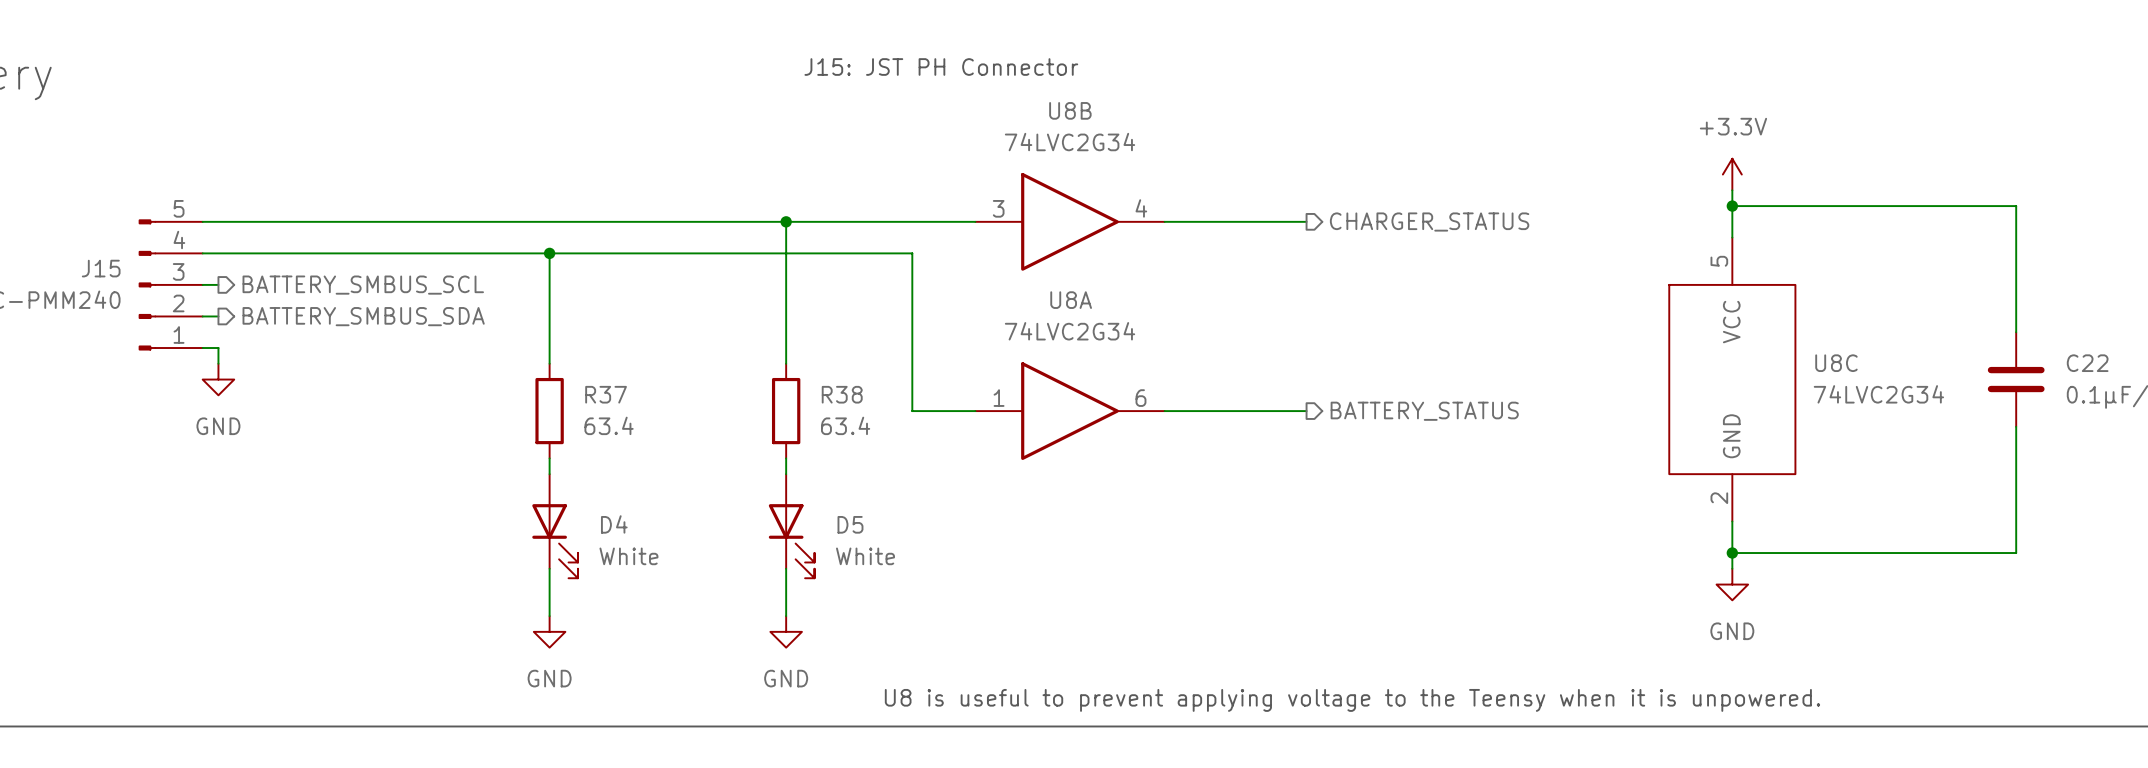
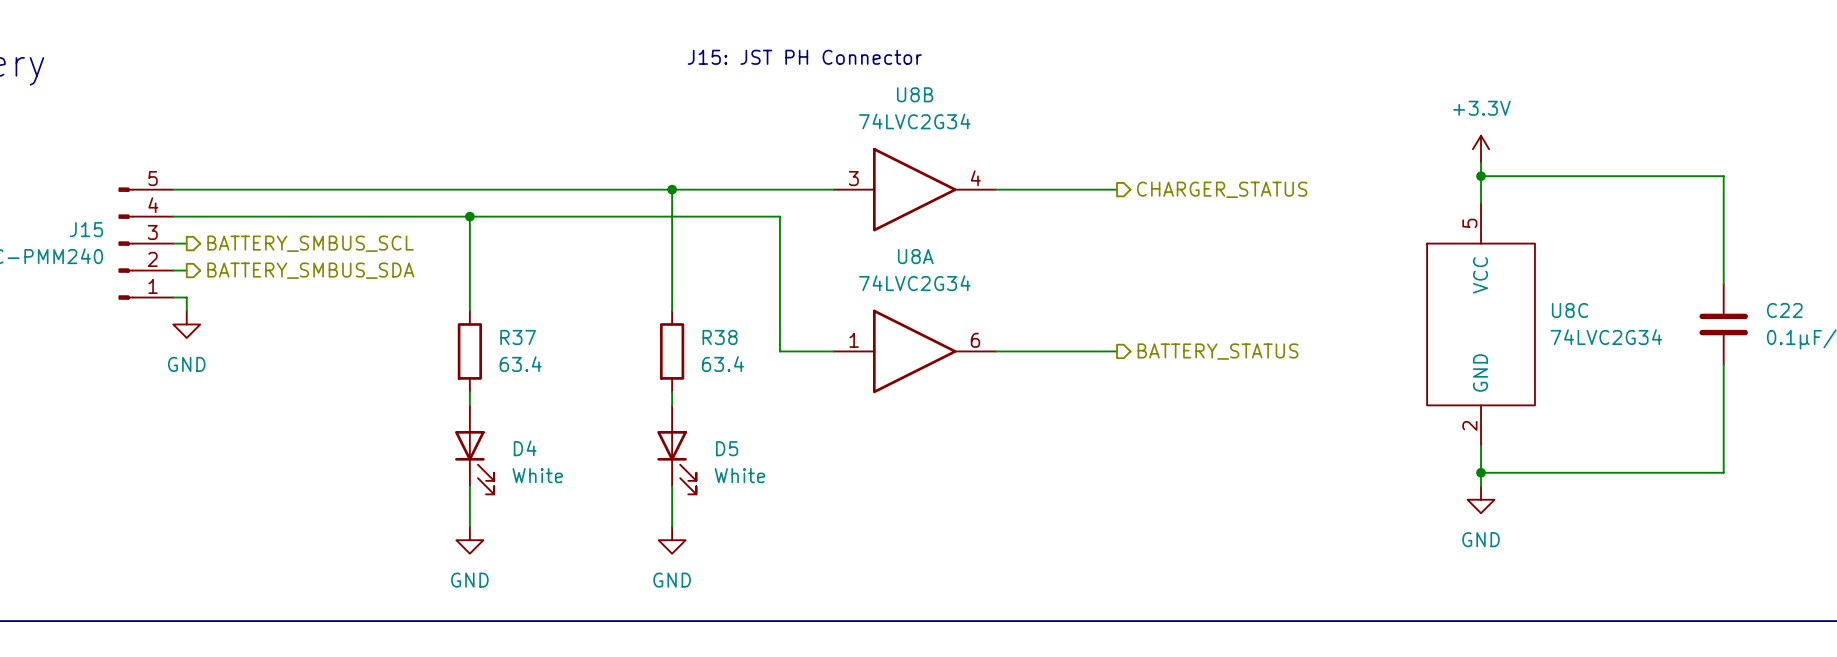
text: U8 is useful to prevent applying voltage to the Teensy when it is unpowered. (1352, 700) -> none

